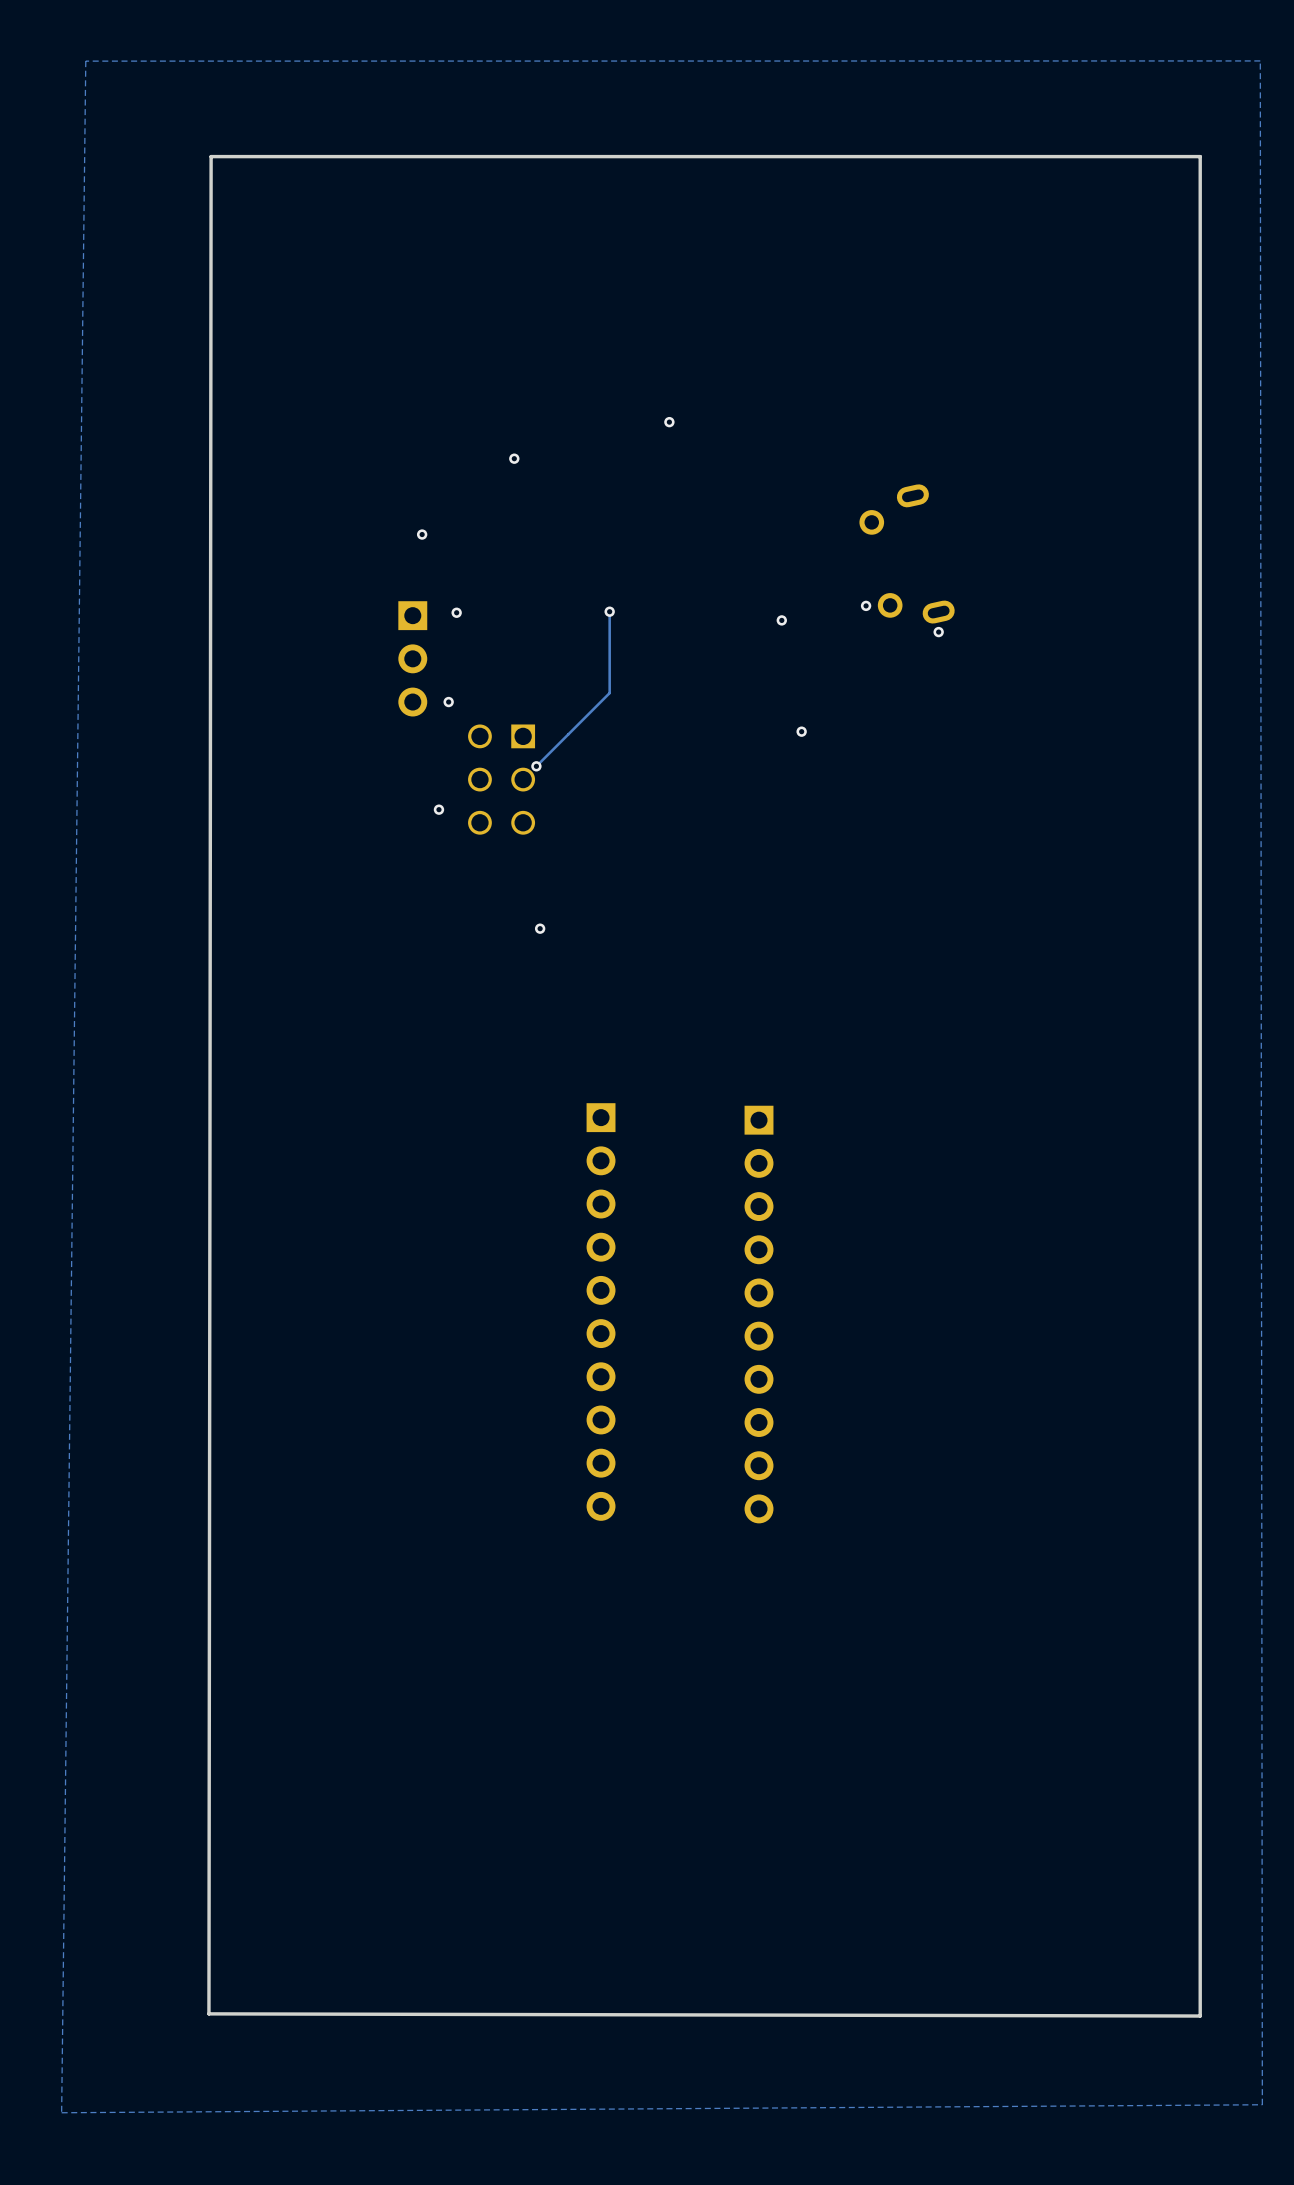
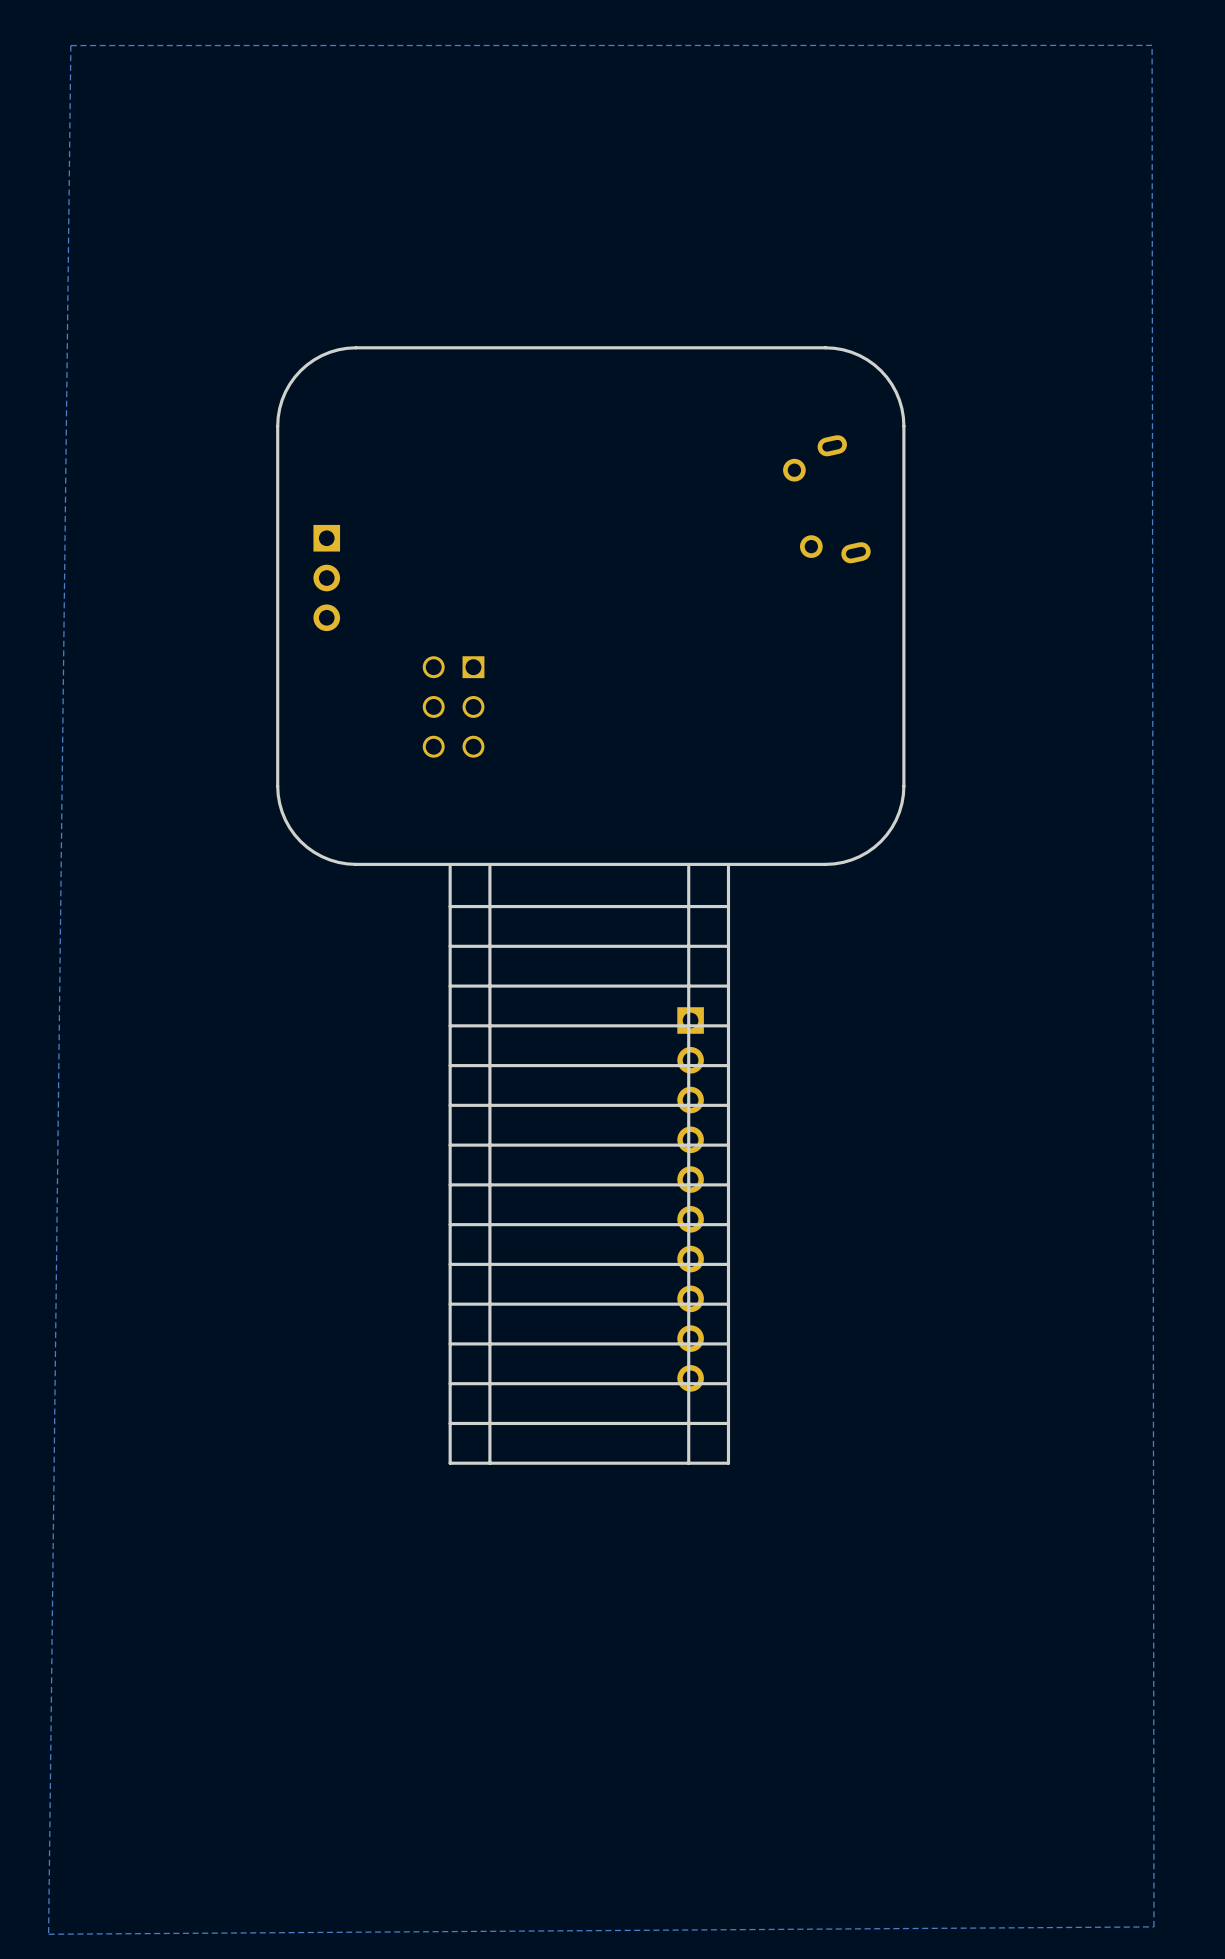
board edge: (1200, 156) (211, 156) (208, 2013) (1200, 2016) (1200, 156) -> none
board edge: none -> (825, 347) (355, 347) (338, 349) (322, 355) (300, 370) (289, 384) (282, 400) (277, 426) (277, 786) (282, 811) (289, 827) (300, 841) (314, 852) (330, 860) (355, 864) (825, 864) (851, 860) (867, 852) (880, 841) (891, 827) (899, 811) (903, 786) (903, 417) (896, 392) (880, 370) (859, 355) (843, 349) (825, 347)
via: (669, 422) -> none
via: (514, 458) -> none
via: (422, 534) -> none
via: (866, 605) -> none
track: (609, 611) (609, 693) (536, 766) -> none
via: (609, 611) -> none
via: (456, 612) -> none
via: (781, 620) -> none
via: (938, 632) -> none
part position: (412, 658) -> (326, 578)
via: (448, 702) -> none
via: (801, 731) -> none
via: (536, 766) -> none
via: (438, 809) -> none
via: (540, 928) -> none
board edge: none -> (489, 866) (489, 1463)
board edge: none -> (688, 866) (688, 1463)
board edge: none -> (728, 866) (728, 1463) (450, 1463) (450, 866)
board edge: none -> (728, 906) (450, 906)
board edge: none -> (728, 946) (450, 946)
board edge: none -> (728, 986) (450, 986)
board edge: none -> (728, 1025) (450, 1025)
board edge: none -> (728, 1065) (450, 1065)
board edge: none -> (728, 1105) (450, 1105)
board edge: none -> (728, 1145) (450, 1145)
board edge: none -> (728, 1184) (450, 1184)
part: (601, 1312) -> none
board edge: none -> (728, 1224) (450, 1224)
board edge: none -> (728, 1264) (450, 1264)
board edge: none -> (728, 1304) (450, 1304)
board edge: none -> (728, 1343) (450, 1343)
board edge: none -> (728, 1383) (450, 1383)
board edge: none -> (728, 1423) (450, 1423)

